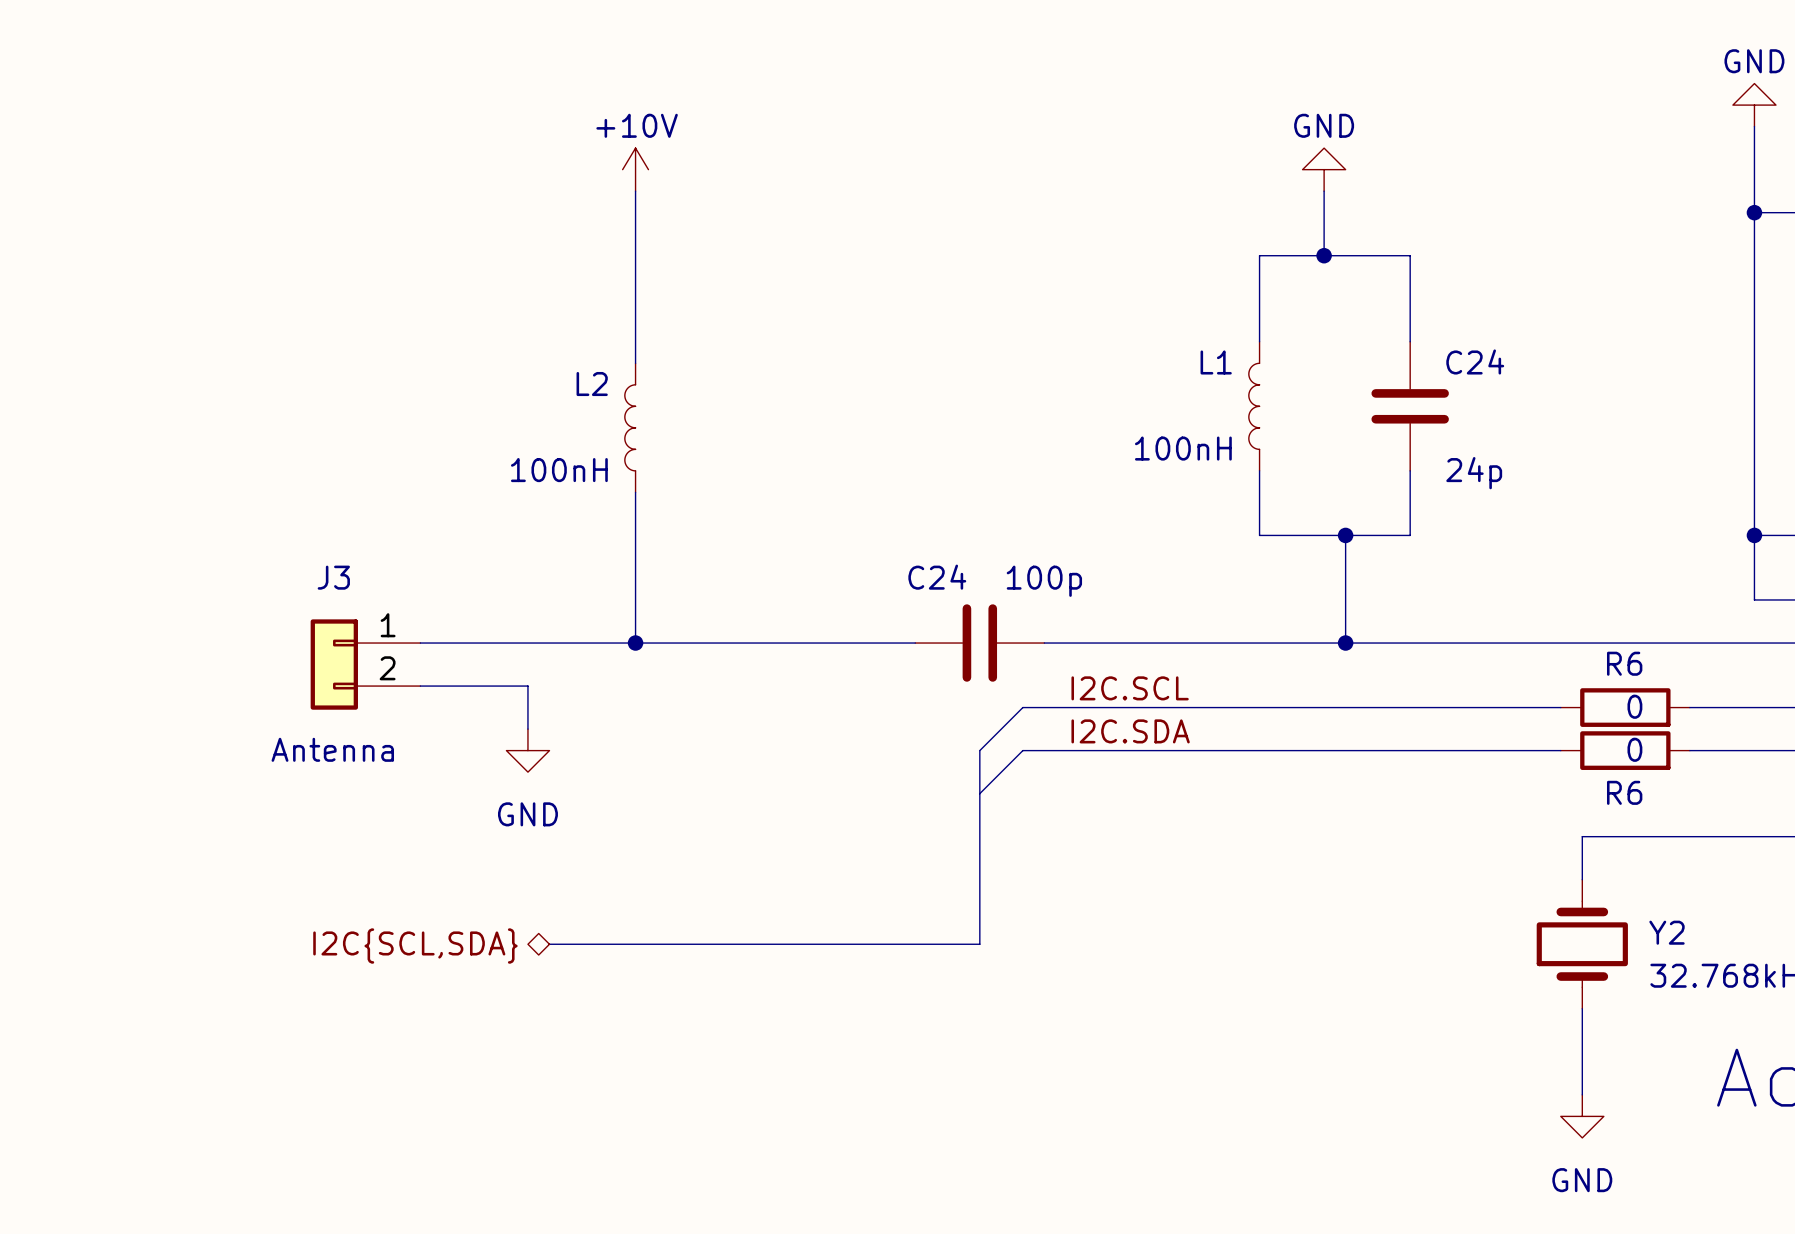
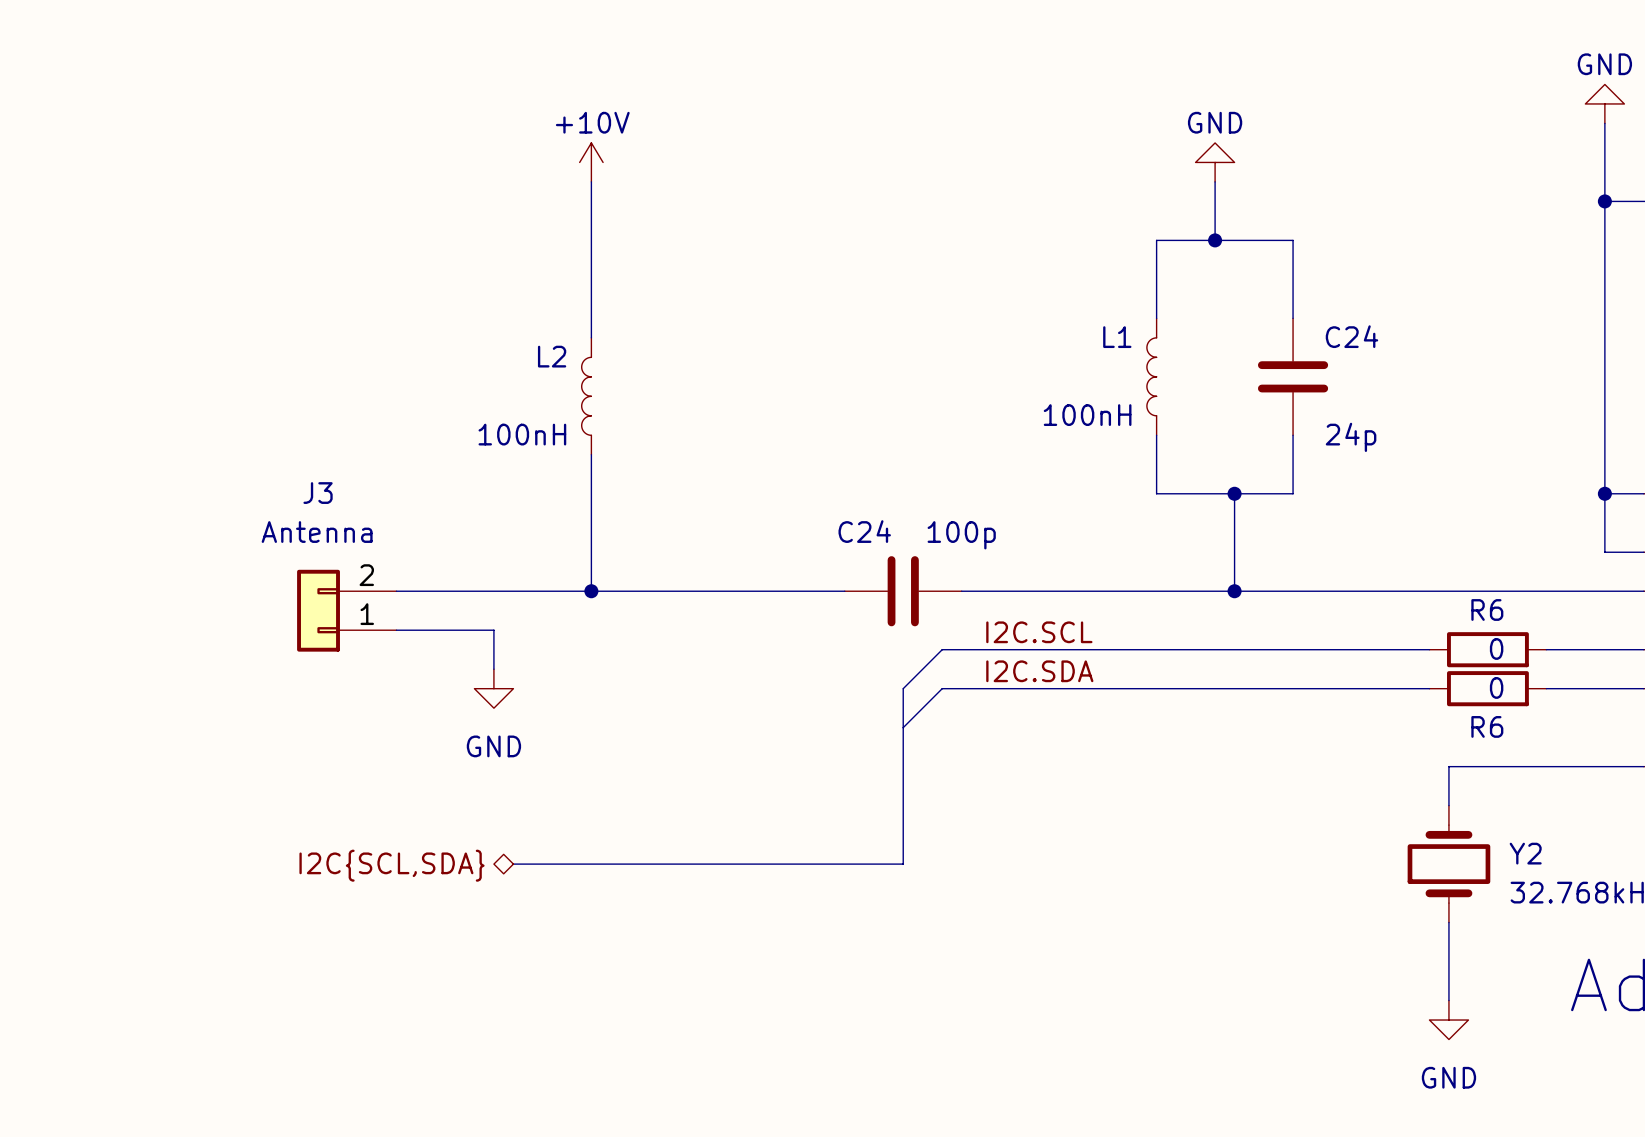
J3 name position: J3 (333, 577) -> J3 (318, 493)
J3 flip: as is (334, 664) -> up-down (318, 610)

